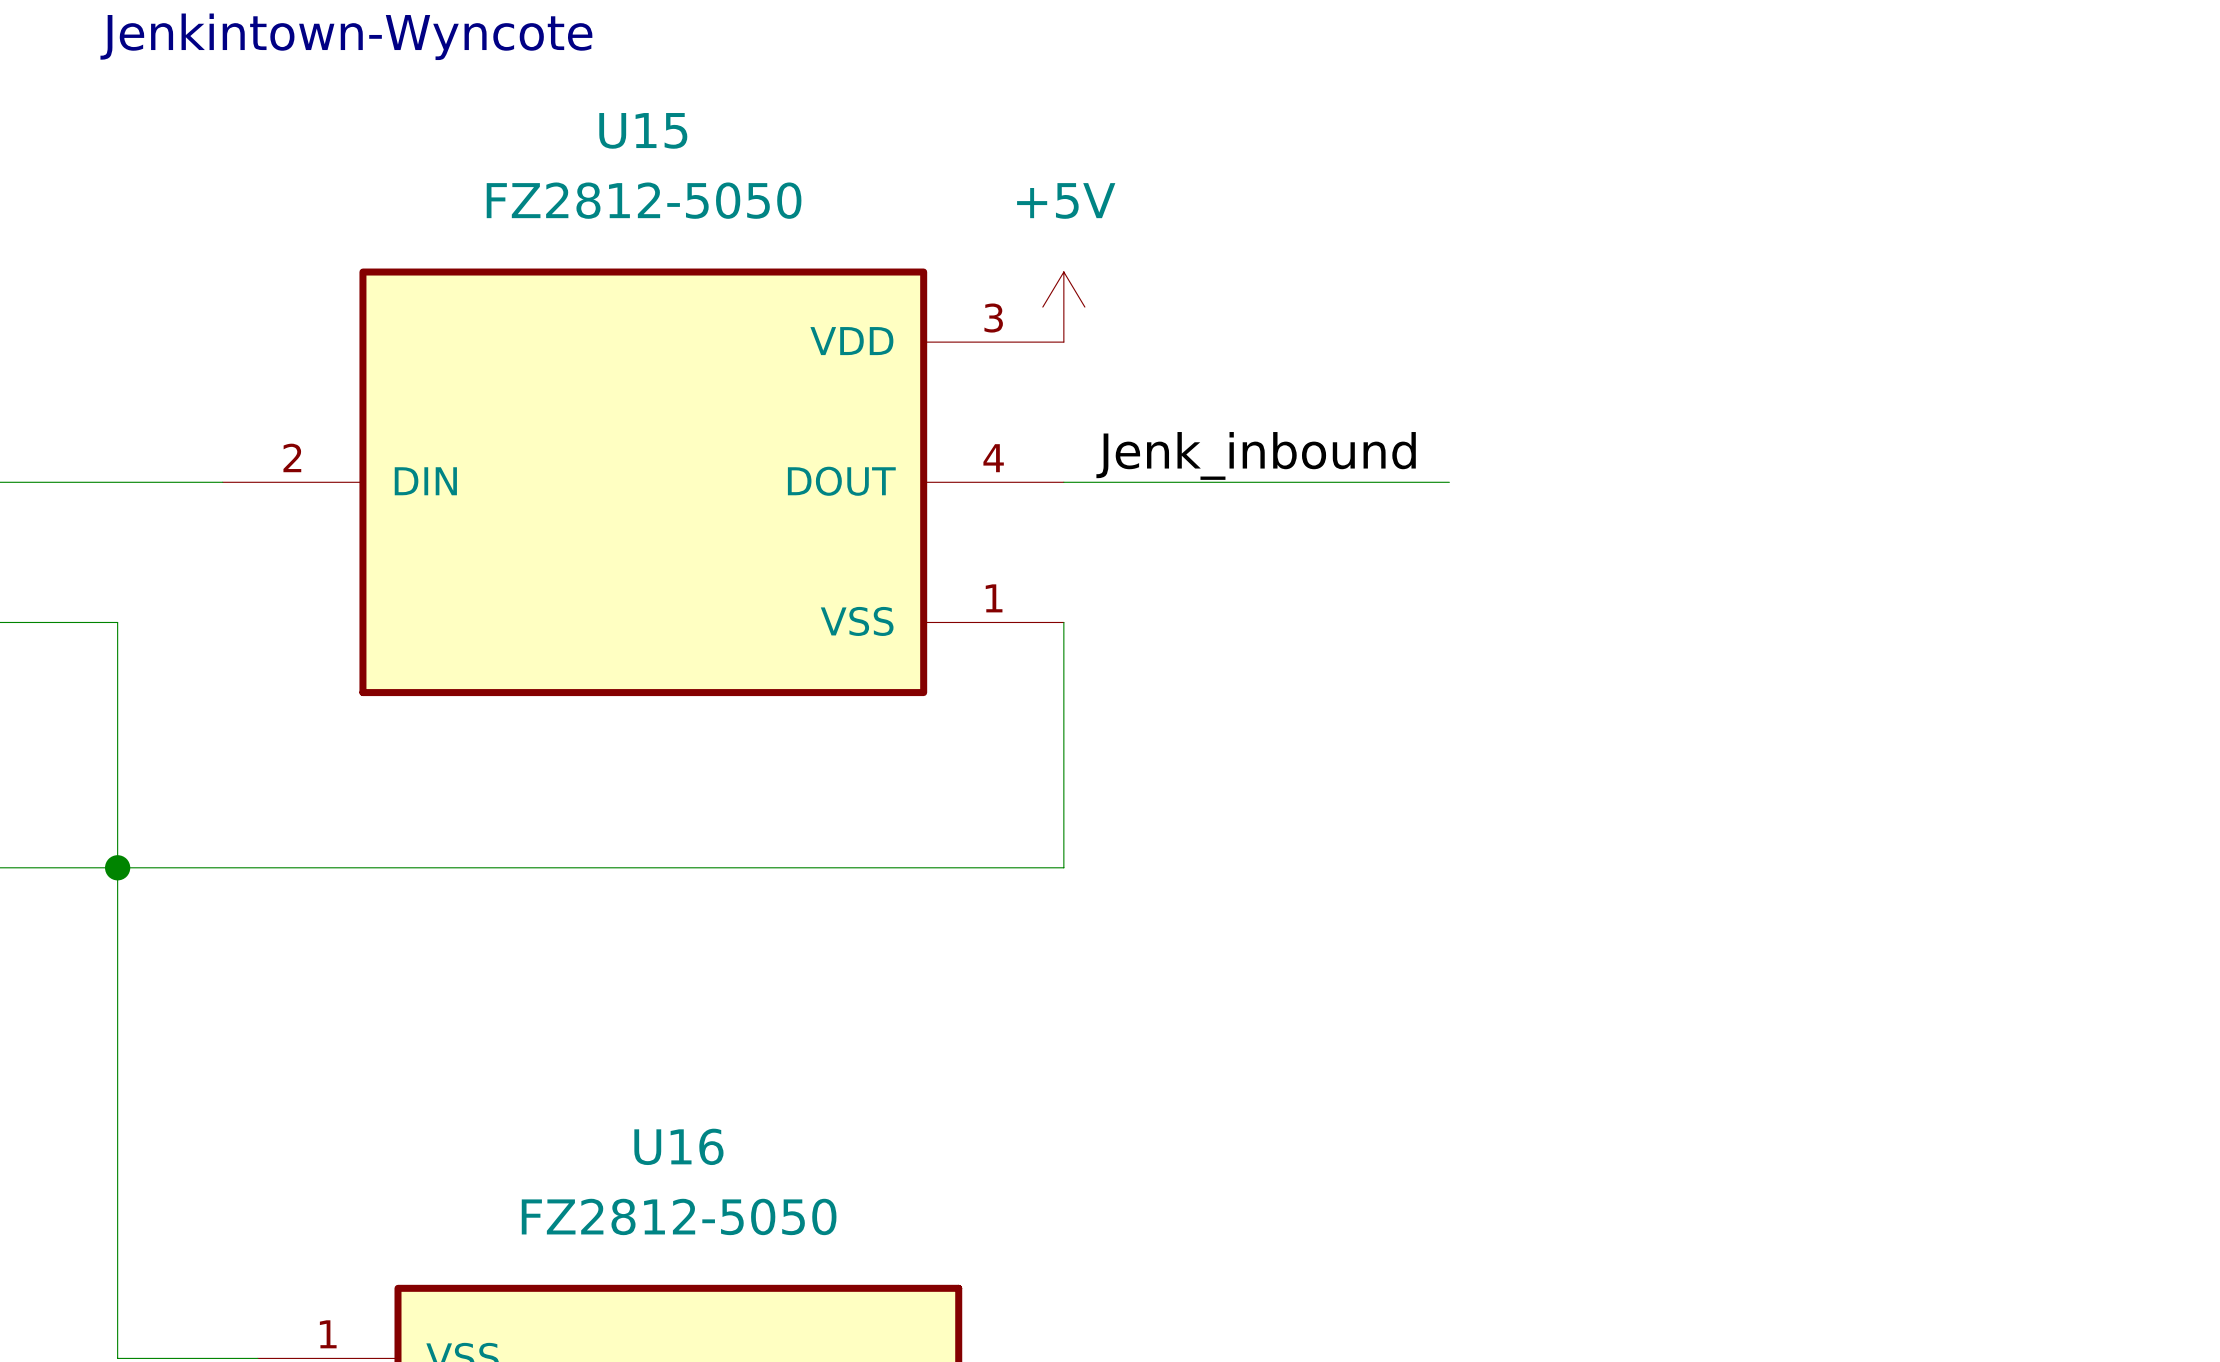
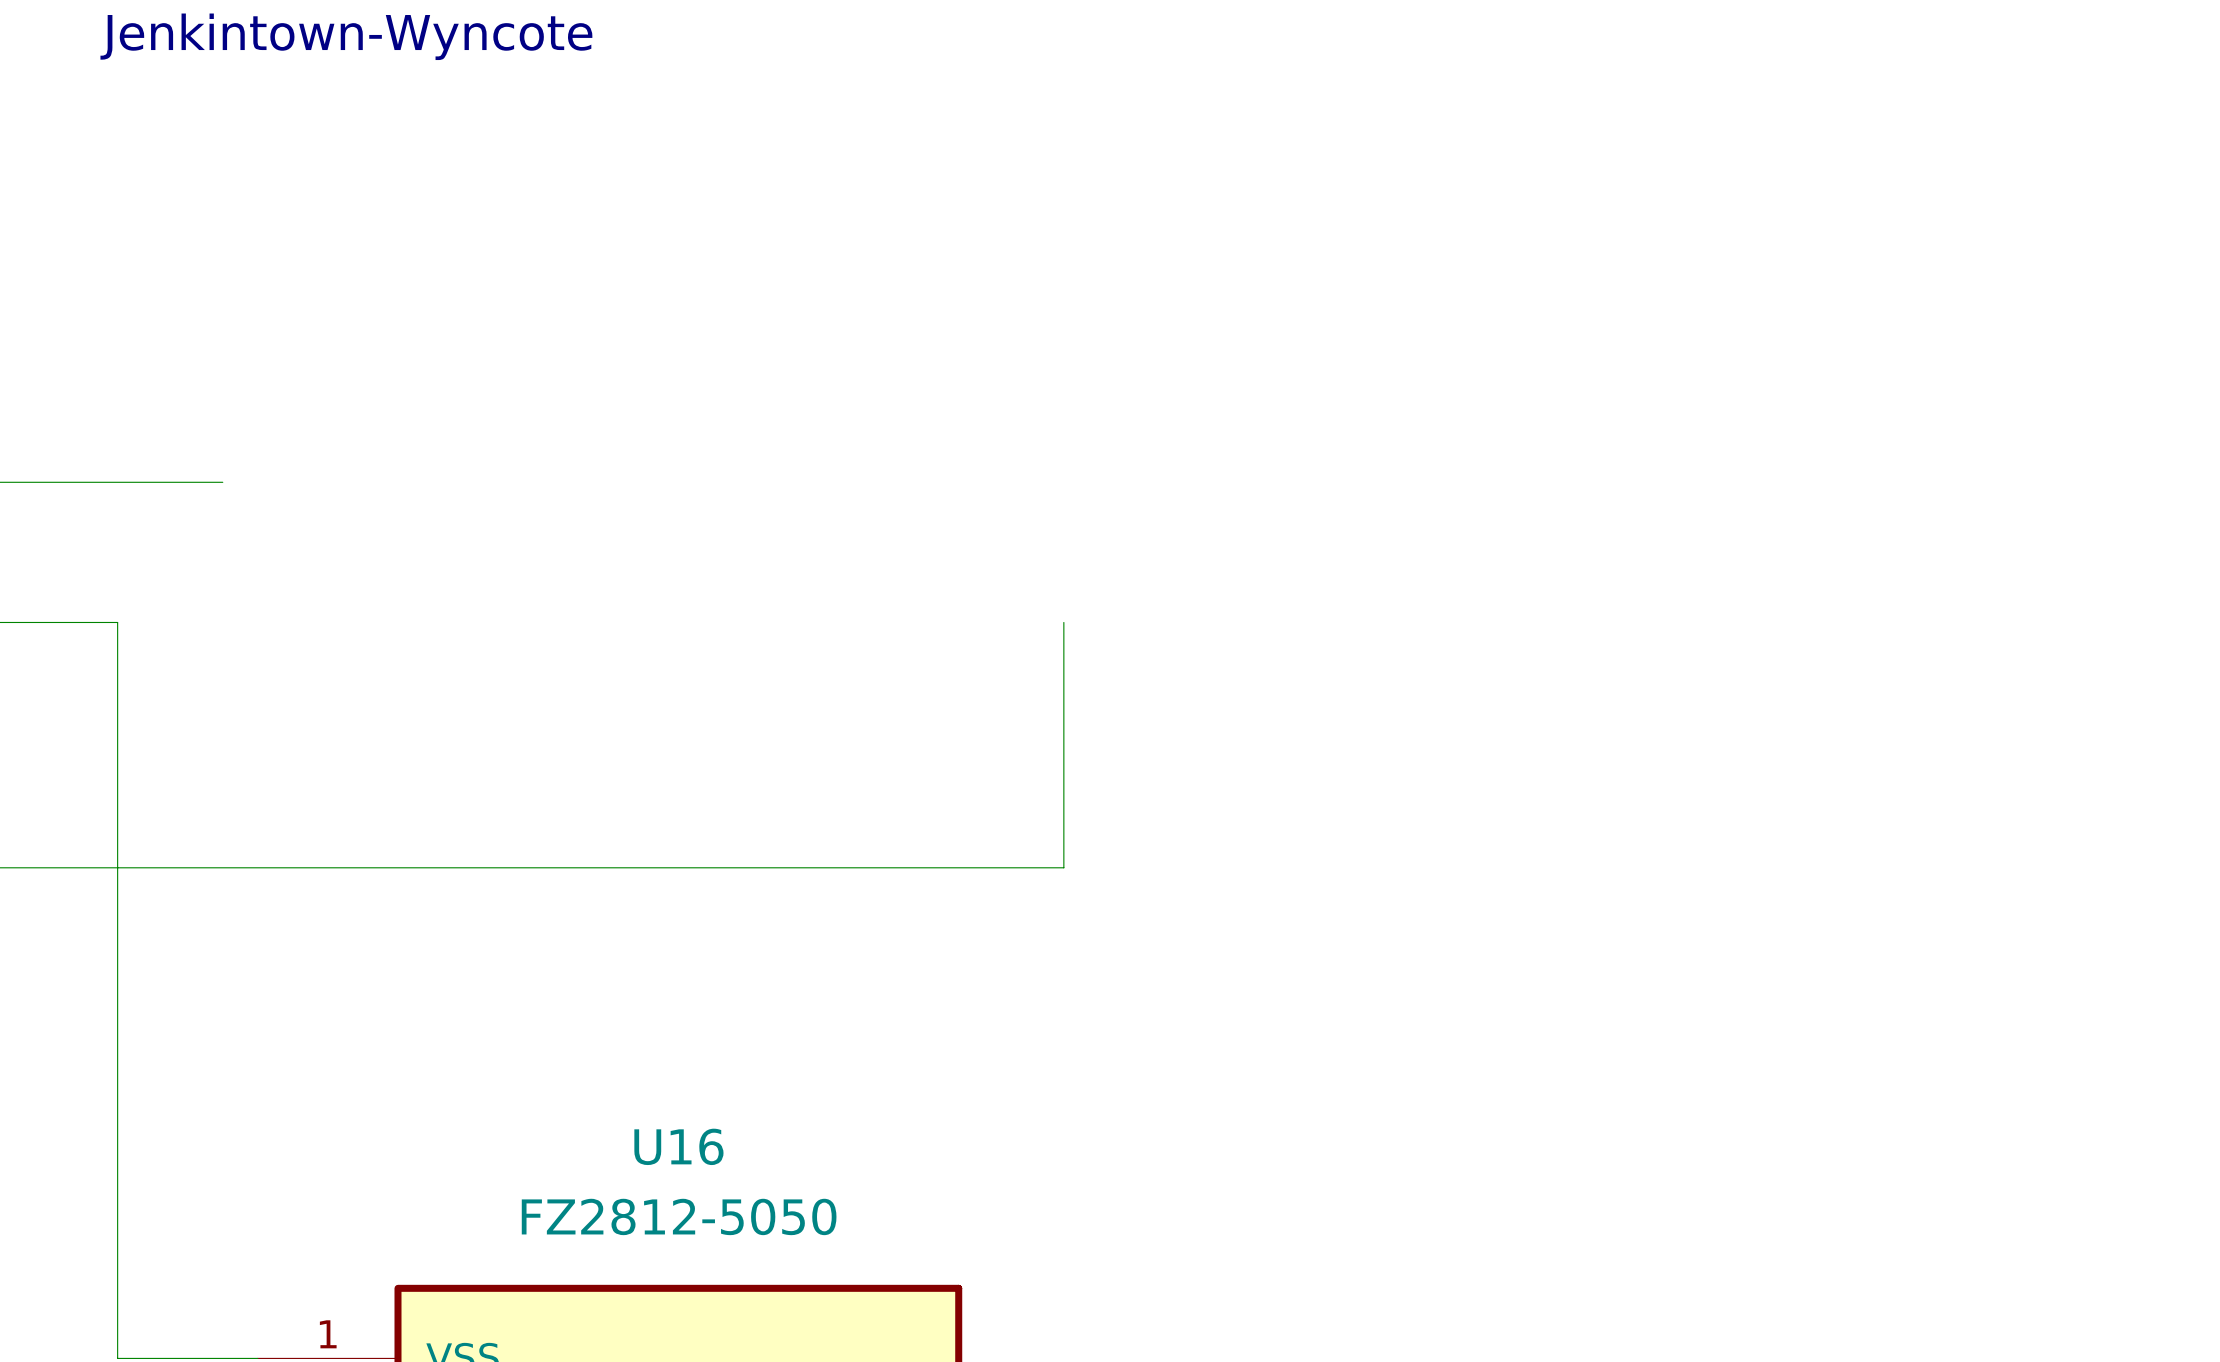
power symbol: +5V (1063, 307) -> none
label: Jenk_inbound (1256, 455) -> none
U15: FZ2812-5050 (643, 482) -> none
wire: (1063, 482) (1449, 482) -> none
junction: (117, 867) -> none

